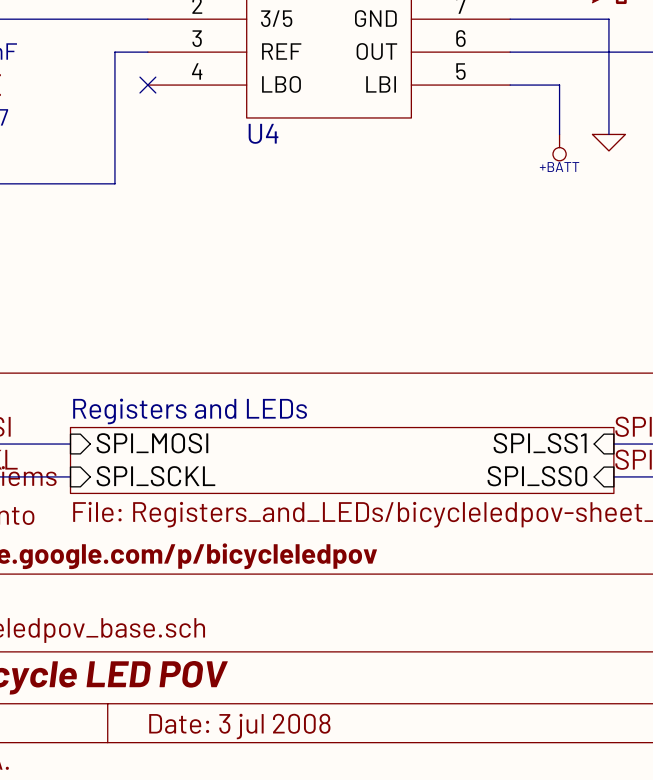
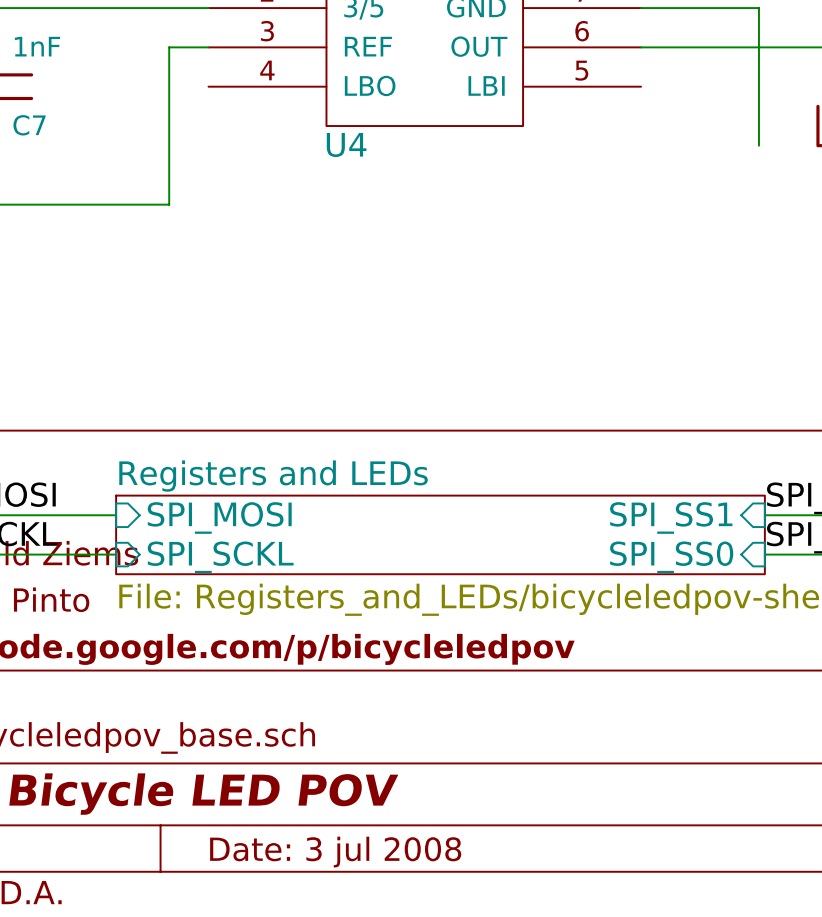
no-connect mark: (147, 85) -> none
wire: (510, 85) (559, 85) (559, 134) -> none
power symbol: (608, 142) -> none
power symbol: +BATT (559, 147) -> none

